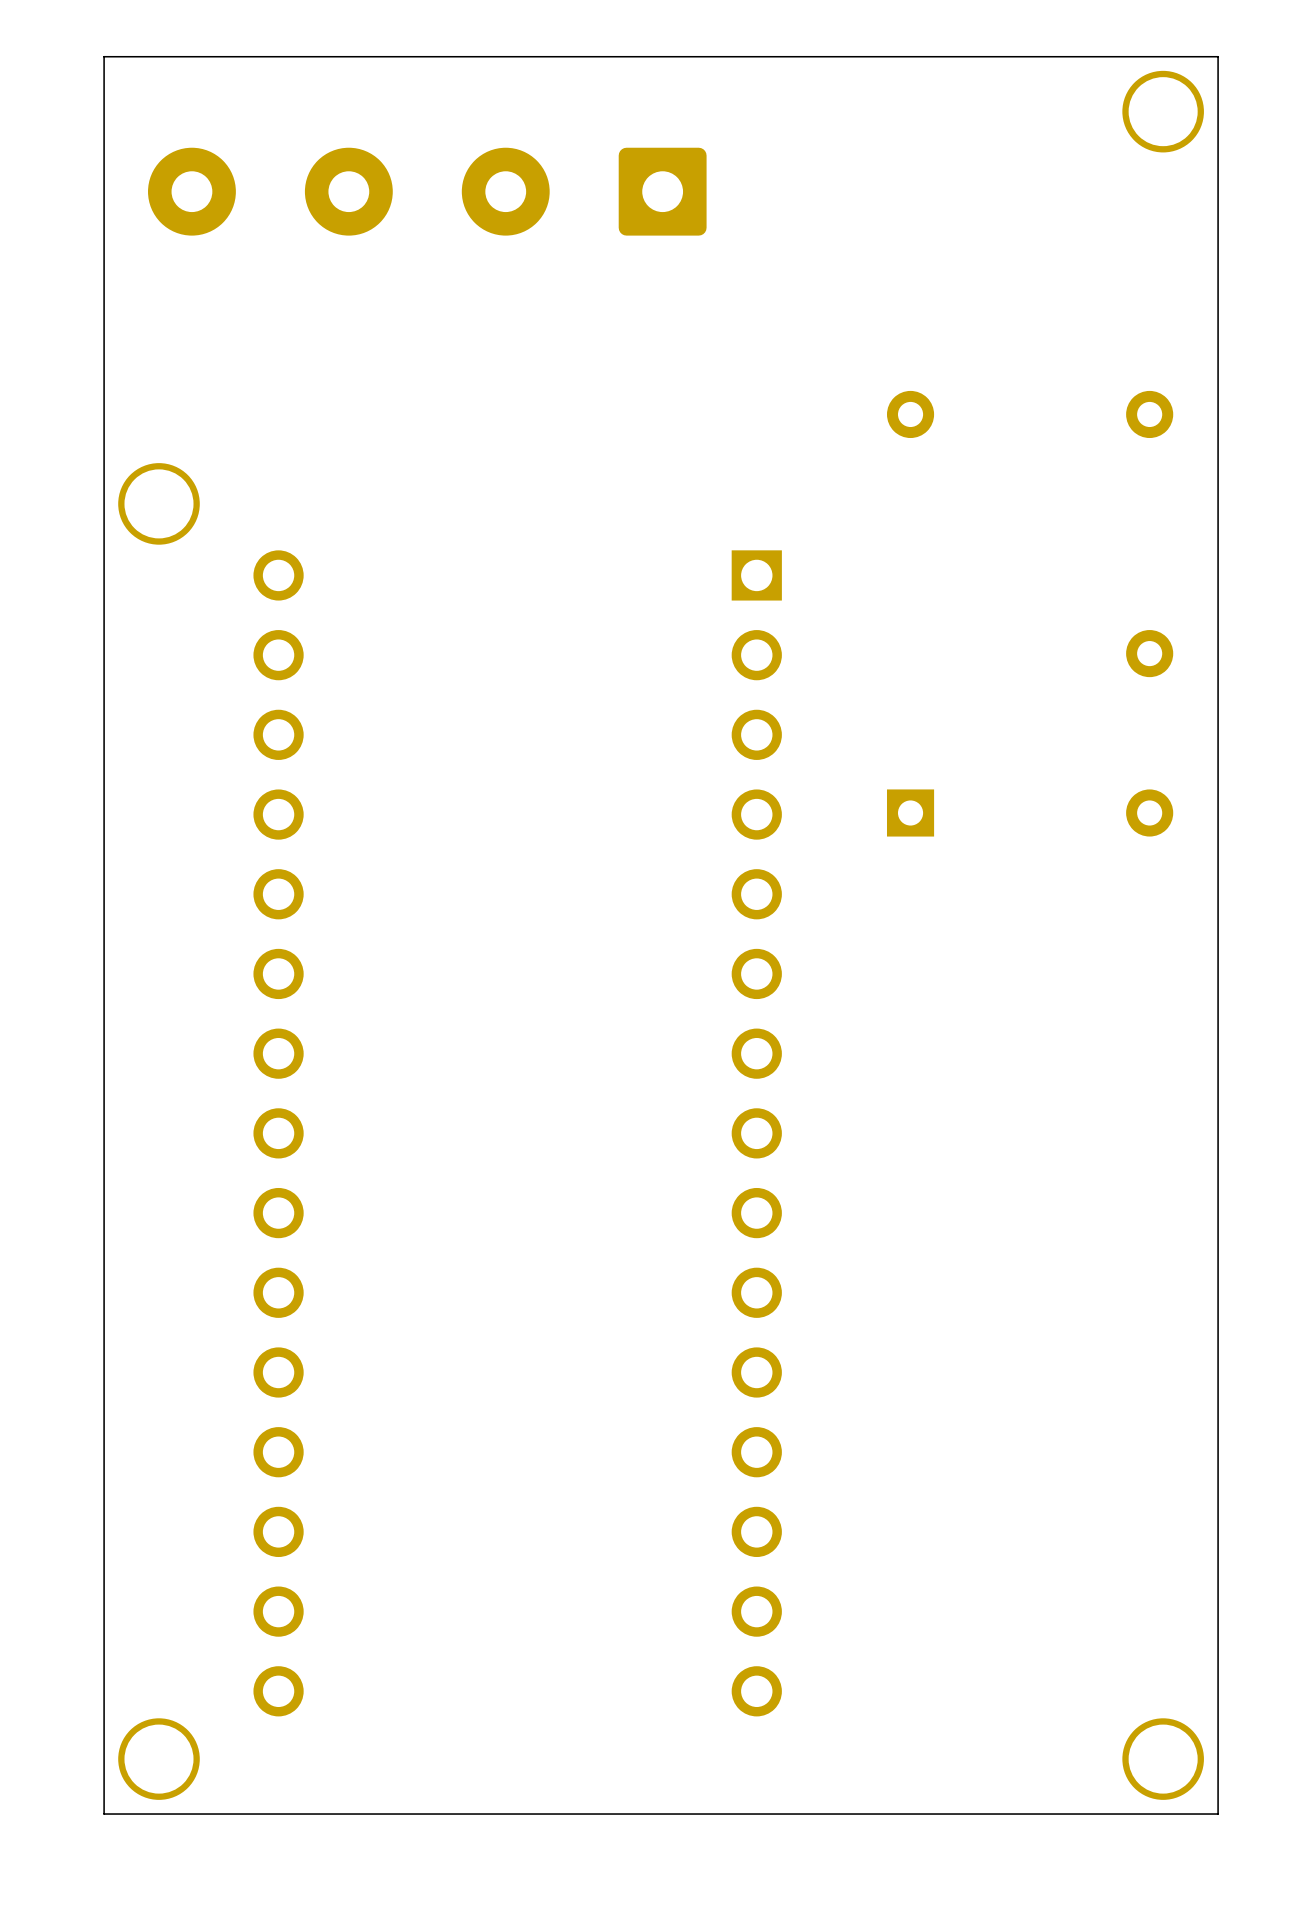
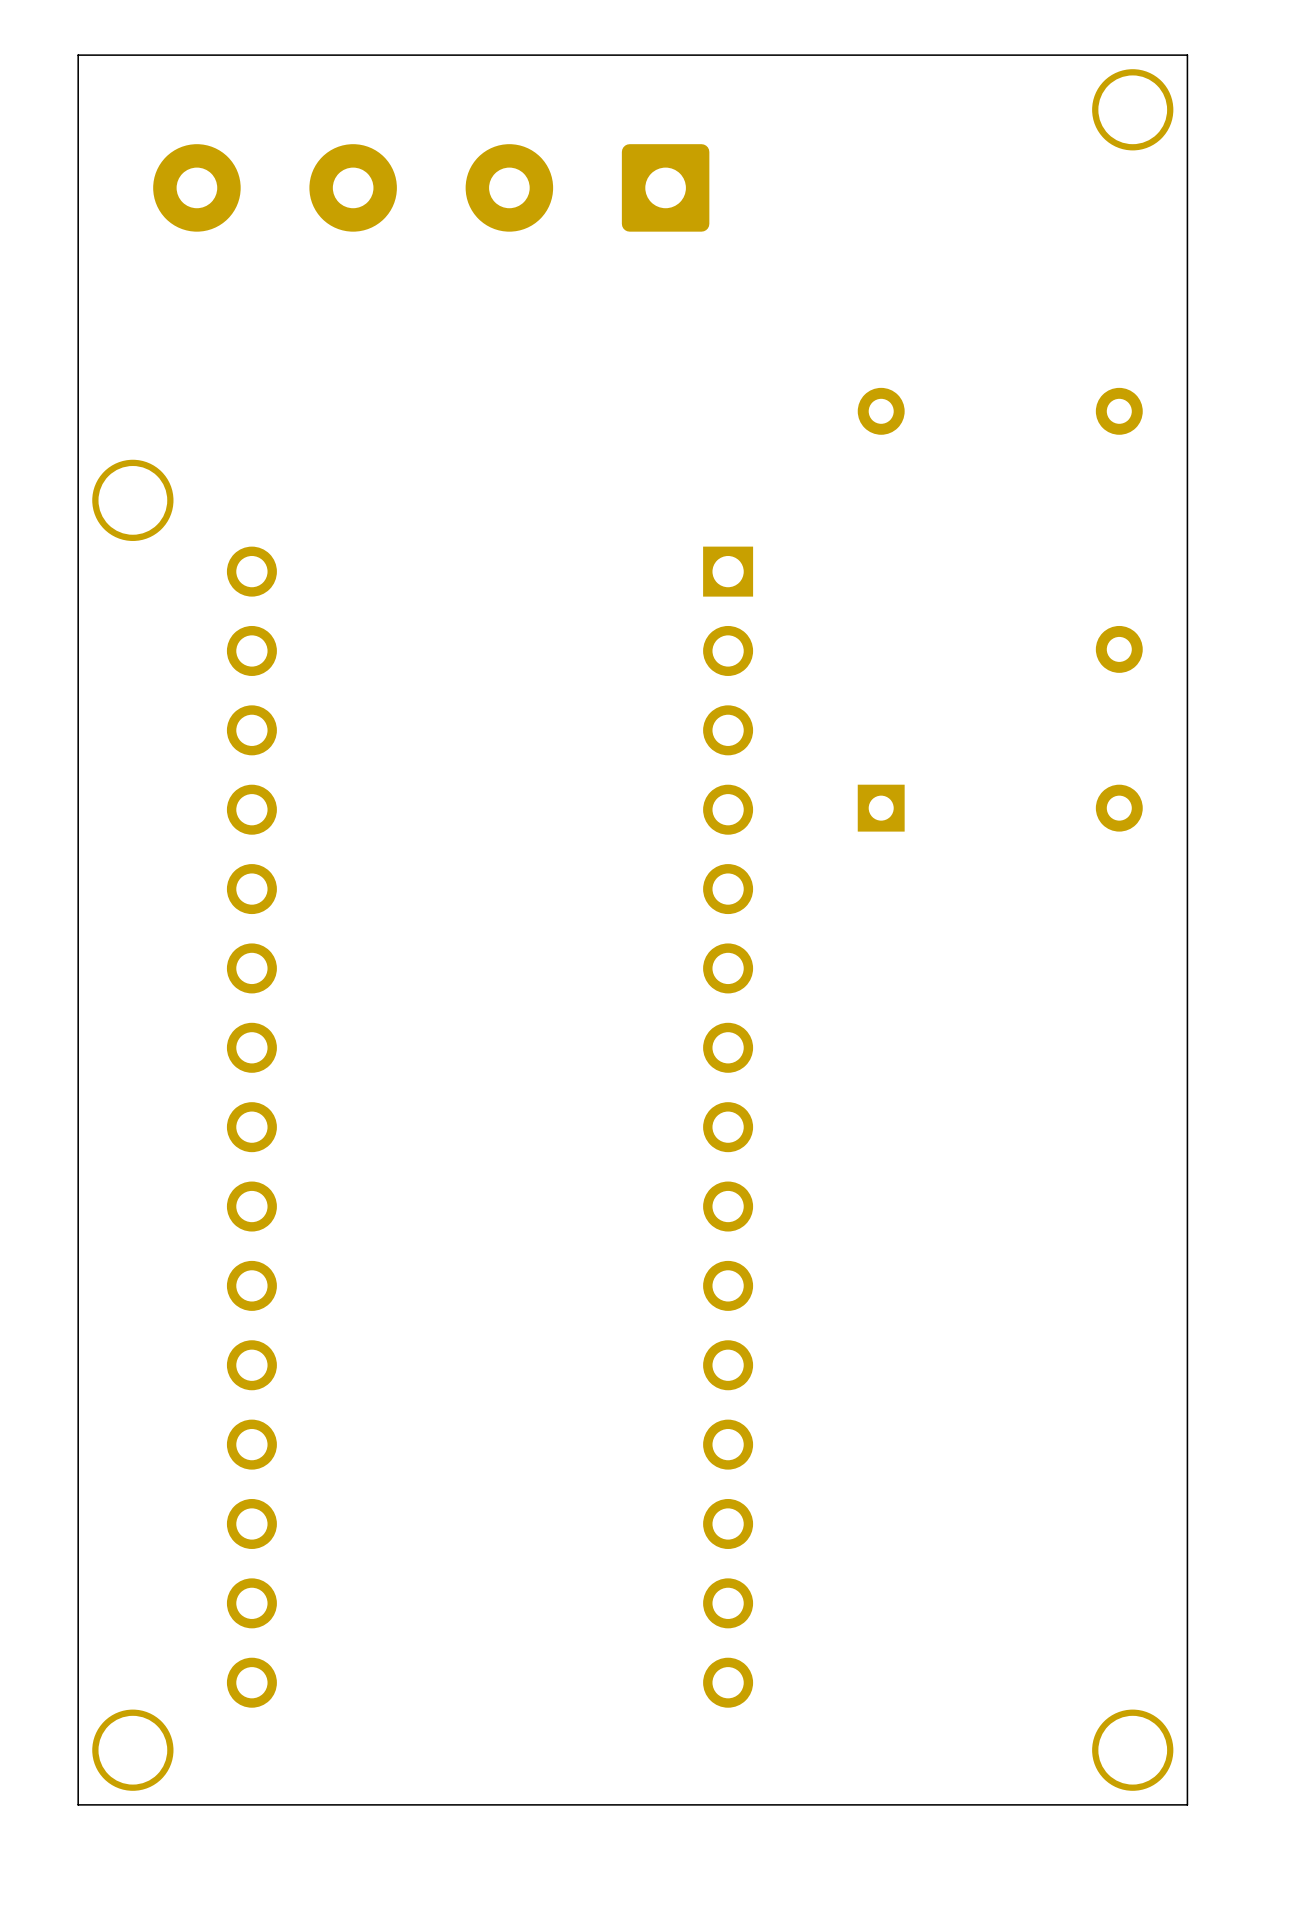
part position: (427, 191) -> (431, 187)

